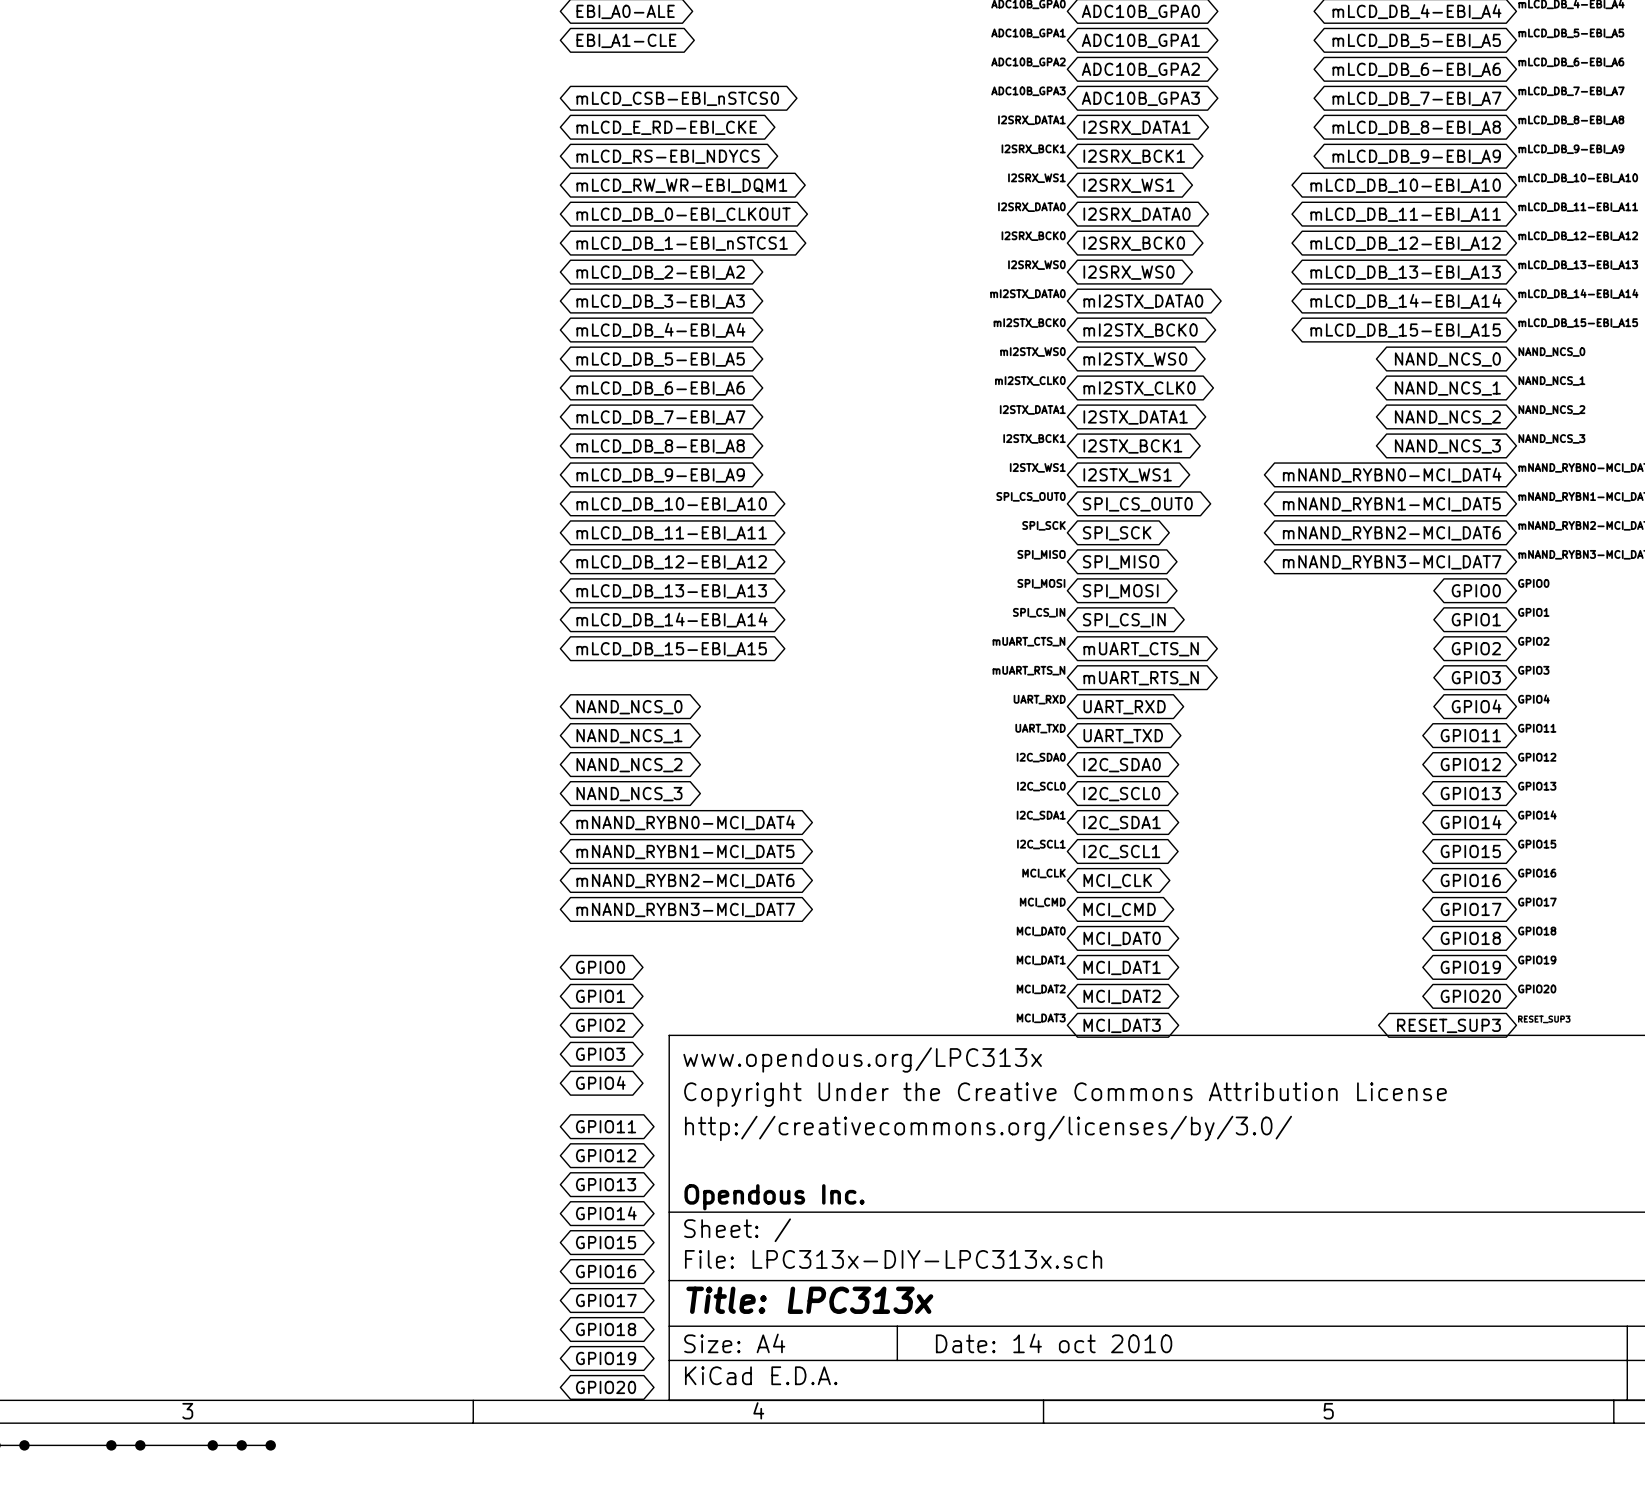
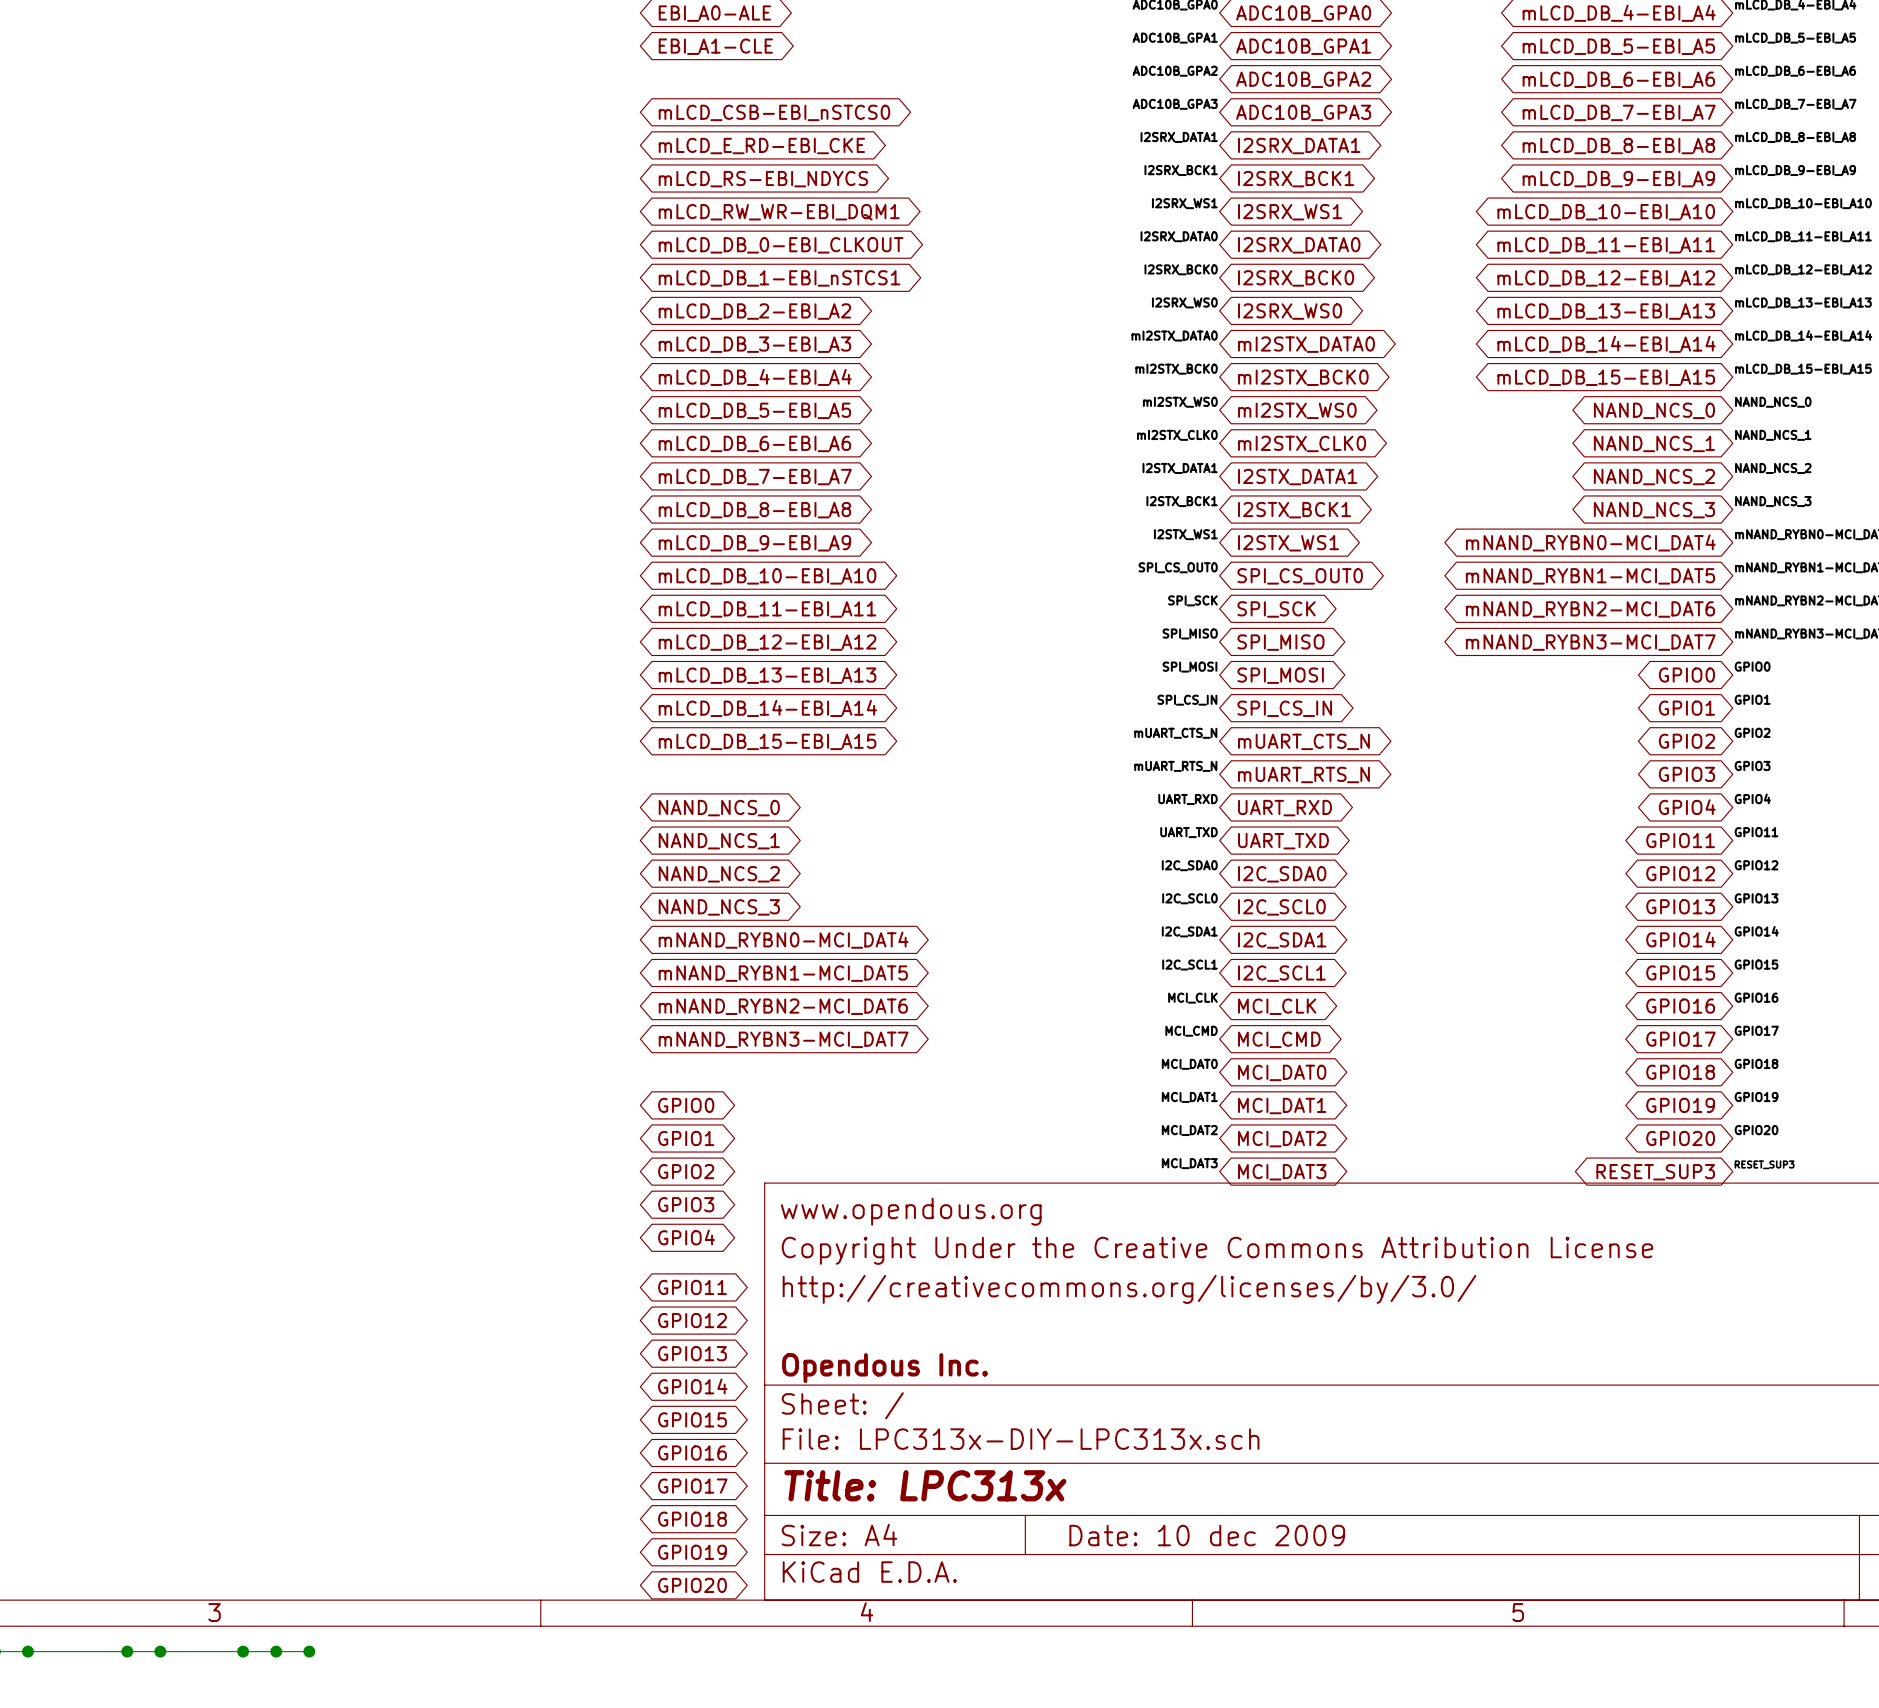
title block: www.opendous.org/LPC313x (862, 1059) -> www.opendous.org (911, 1211)
title block: Date: 14 oct 2010 (1054, 1343) -> Date: 10 dec 2009 (1207, 1535)

